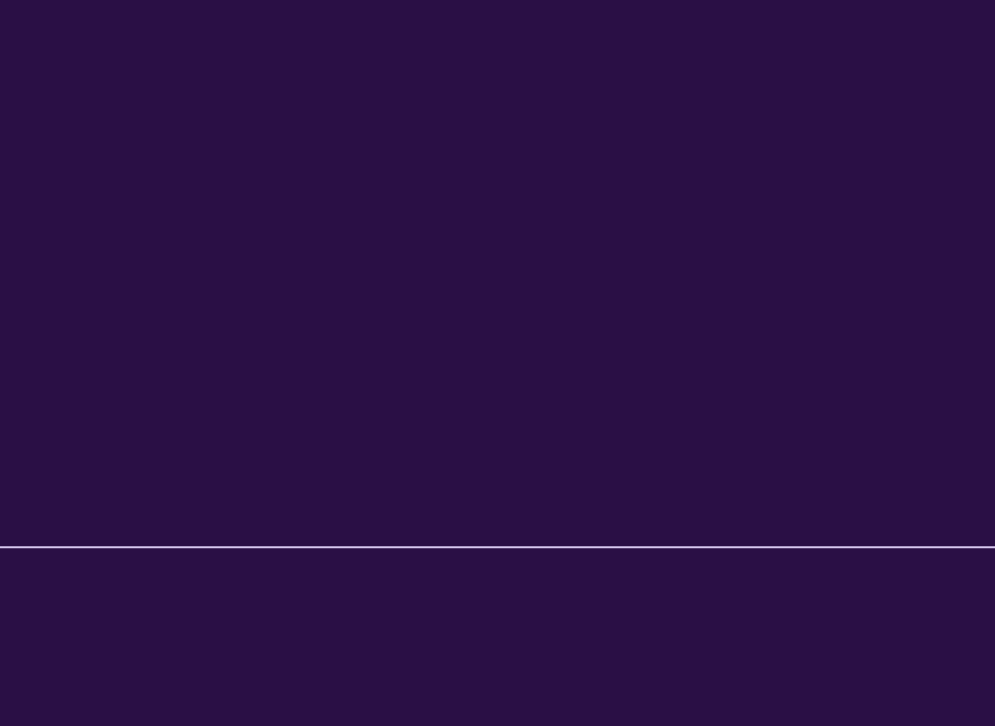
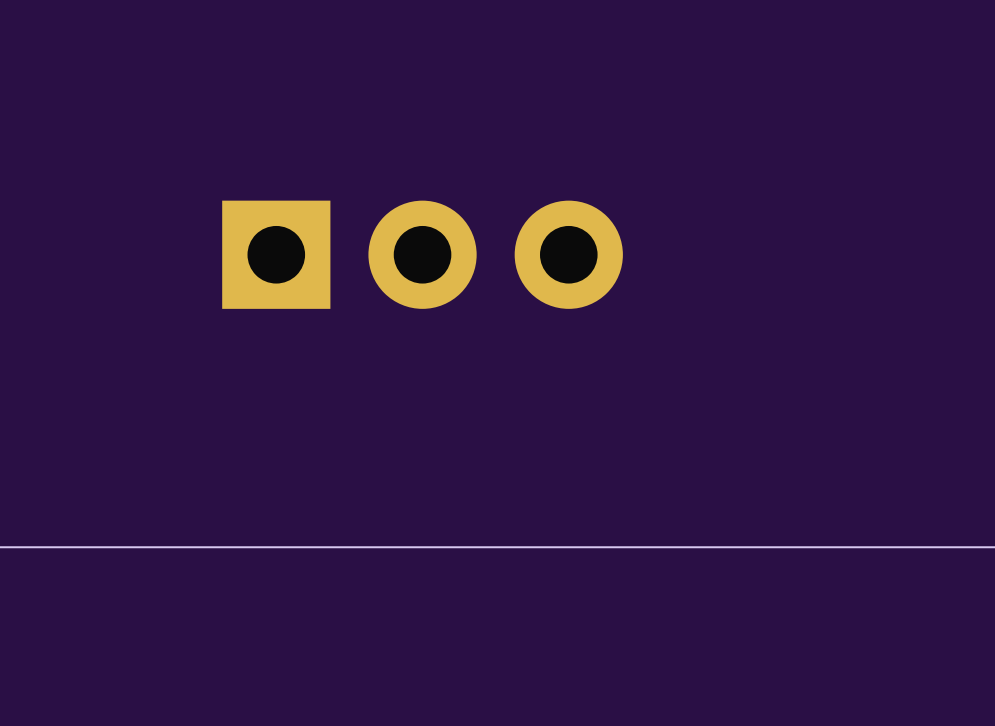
part: none -> (422, 254)

